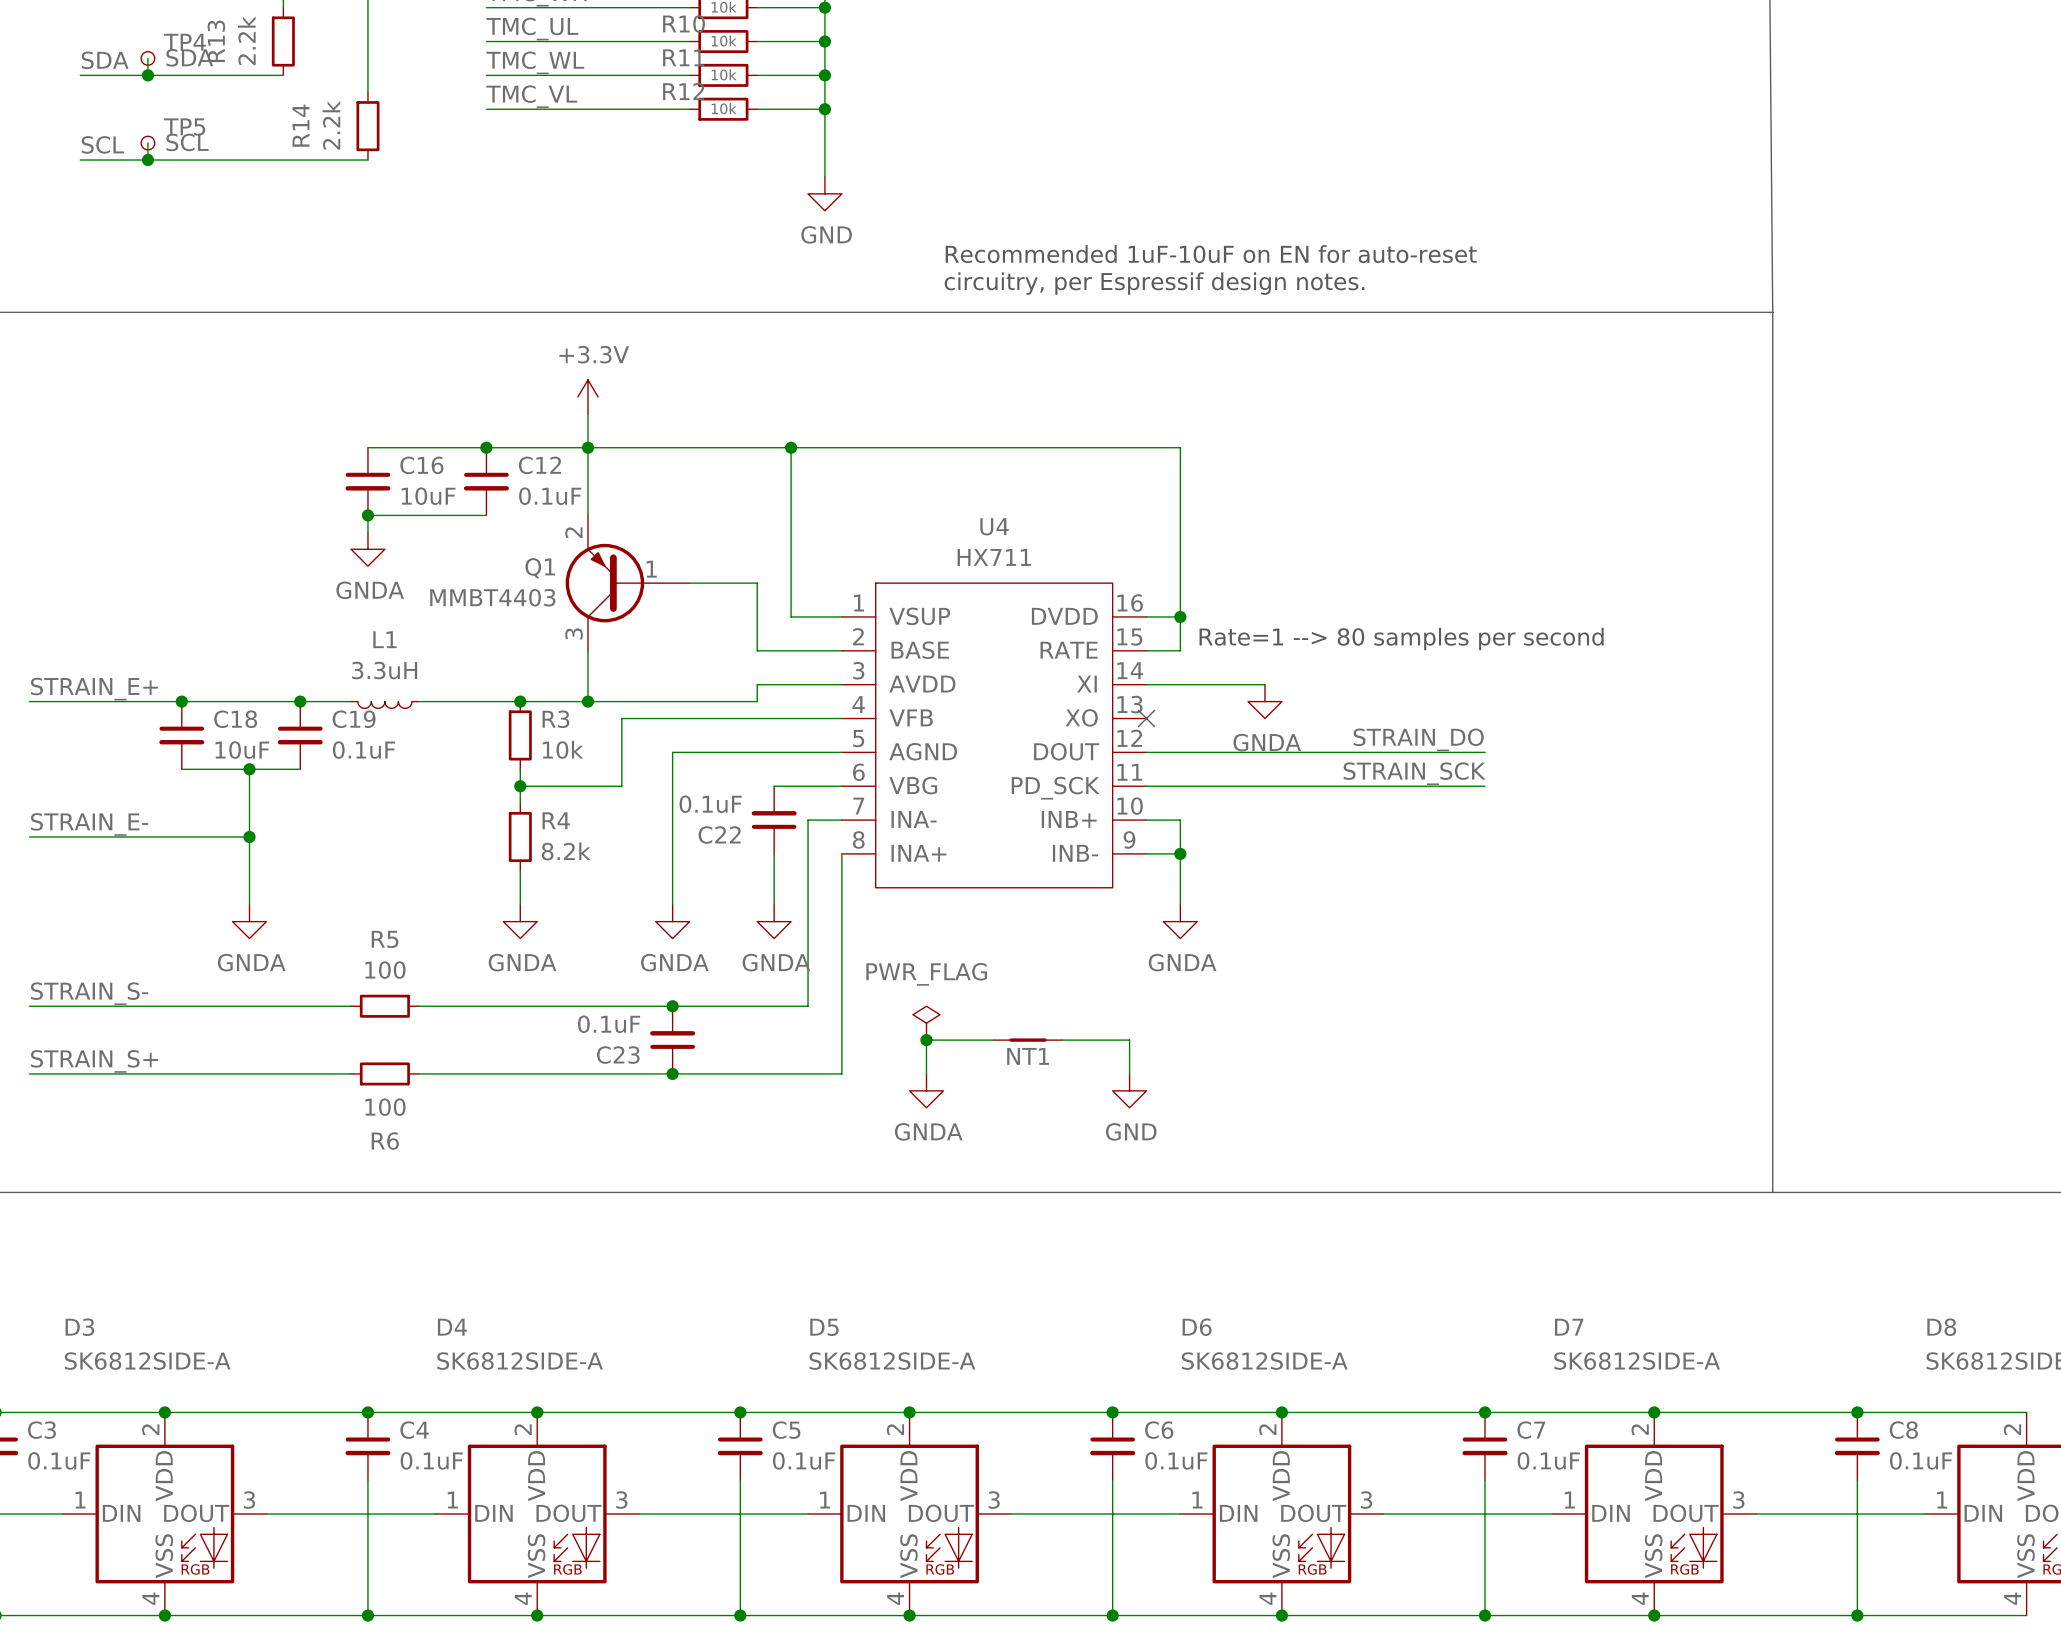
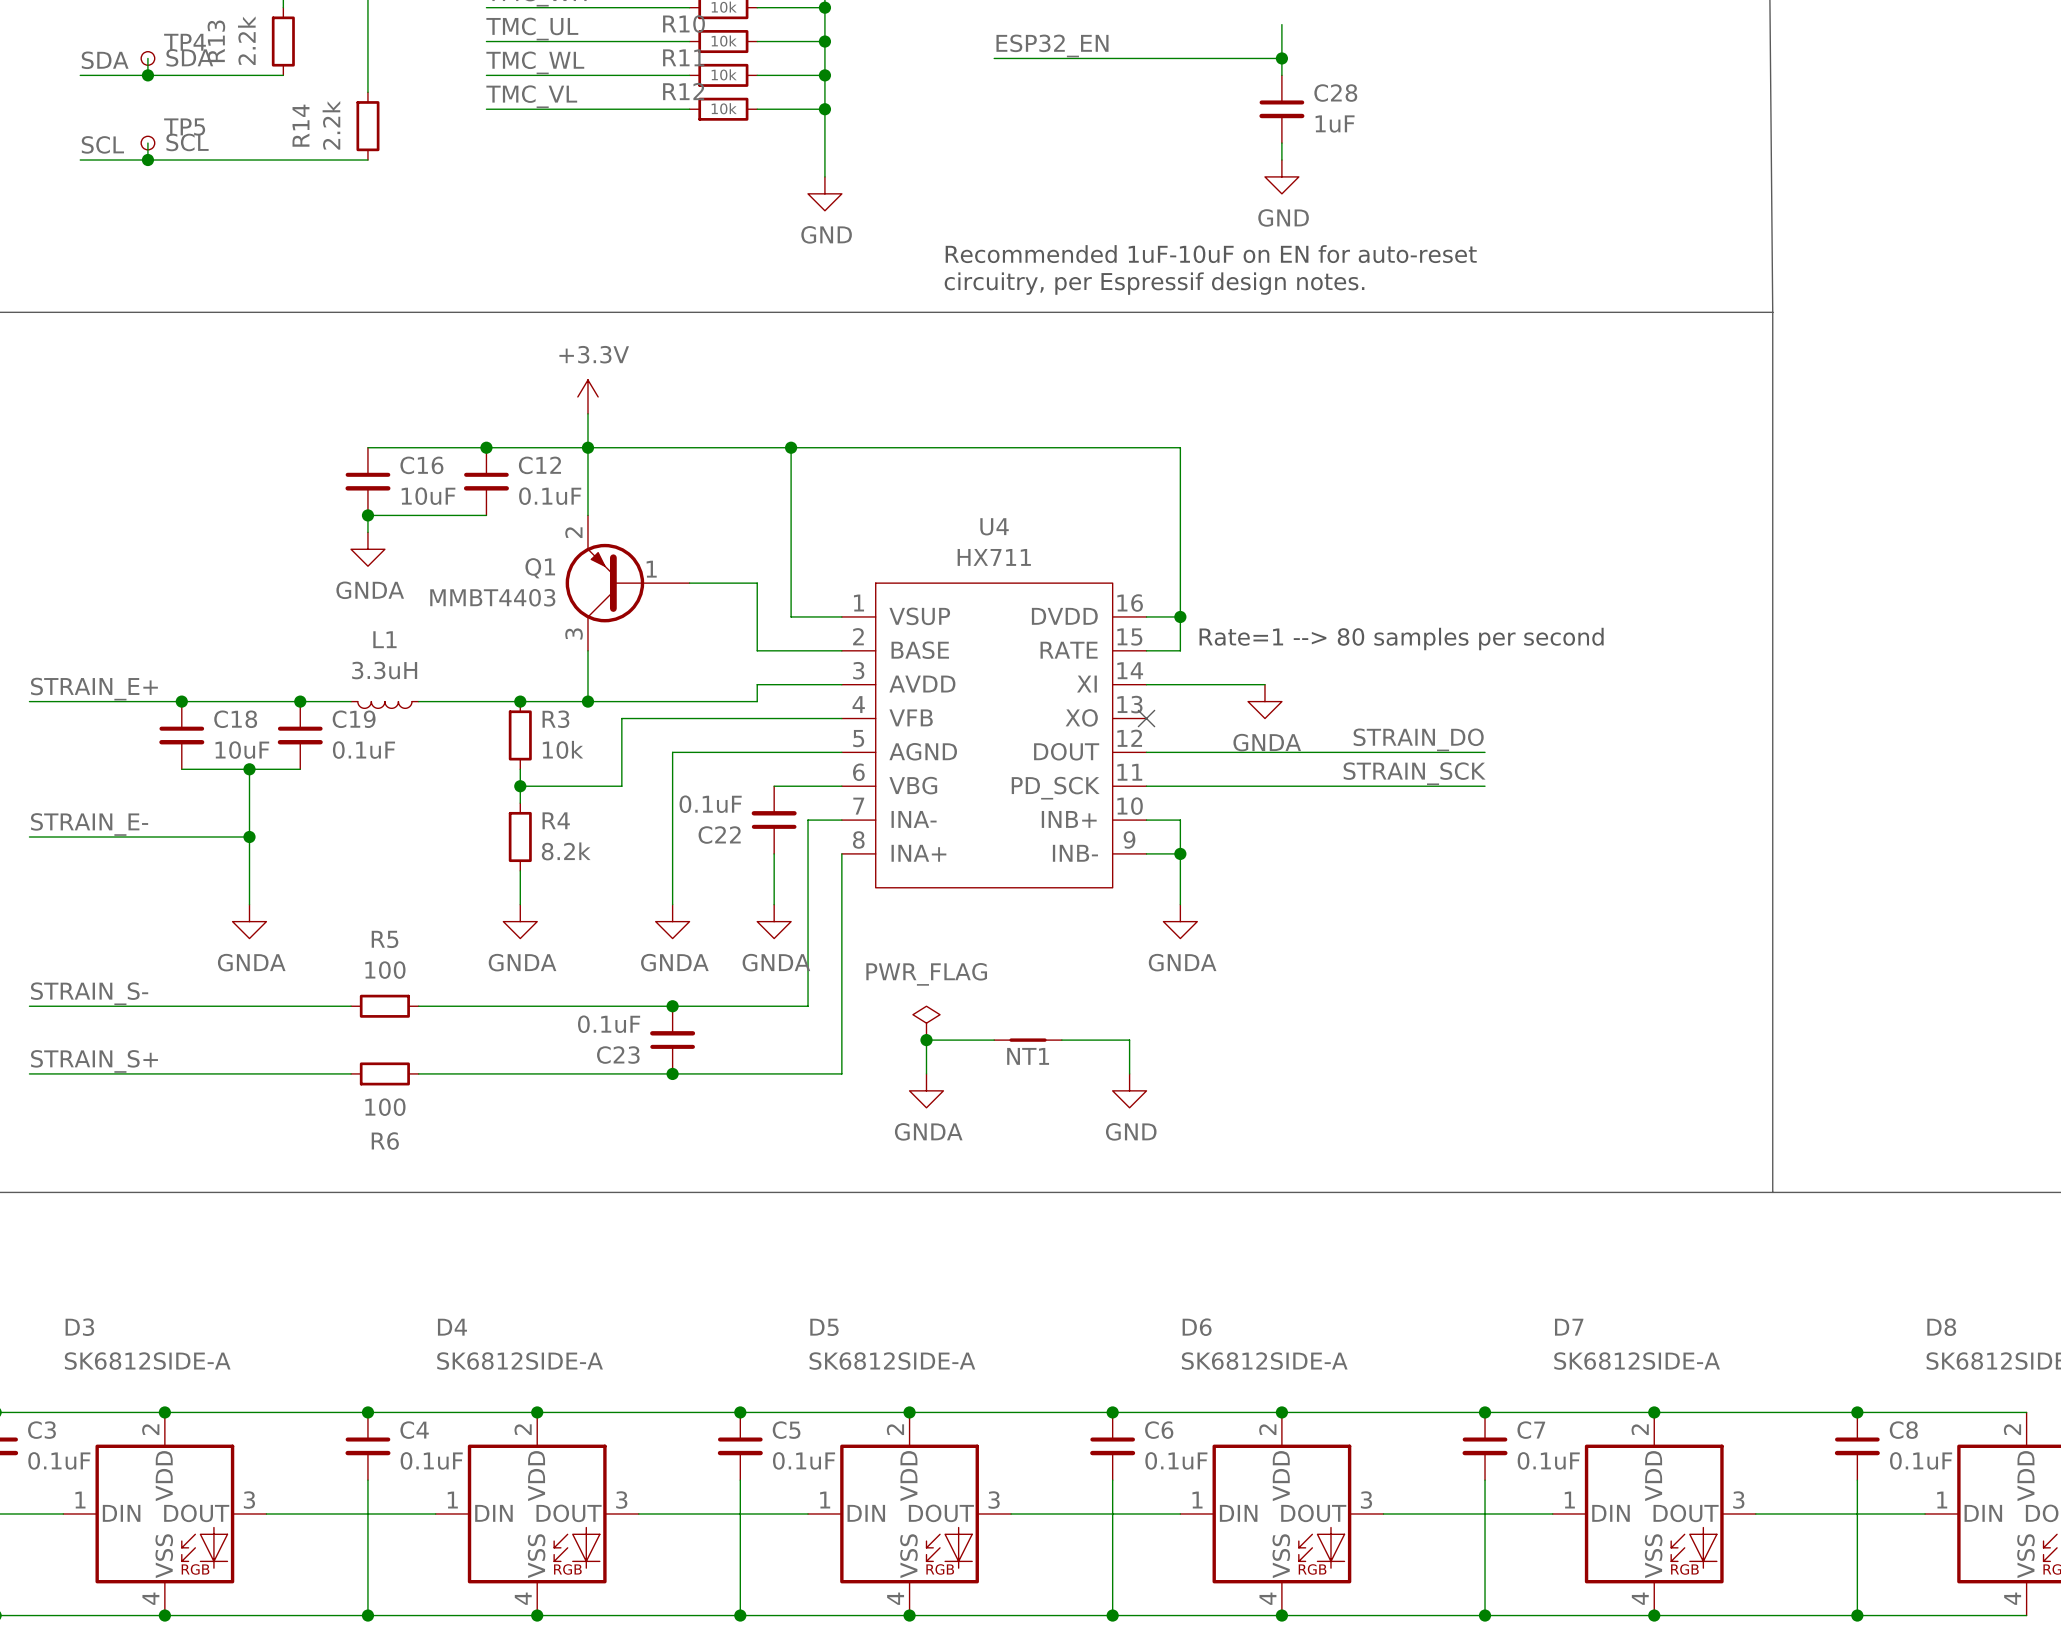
wire: none -> (1281, 24) (1281, 75)
label: none -> ESP32_EN (1052, 45)
wire: none -> (994, 58) (1281, 58)
junction: none -> (1281, 58)
C28: none -> 1uF (1281, 109)
wire: none -> (1281, 143) (1281, 160)
power symbol: none -> GND (1281, 176)

